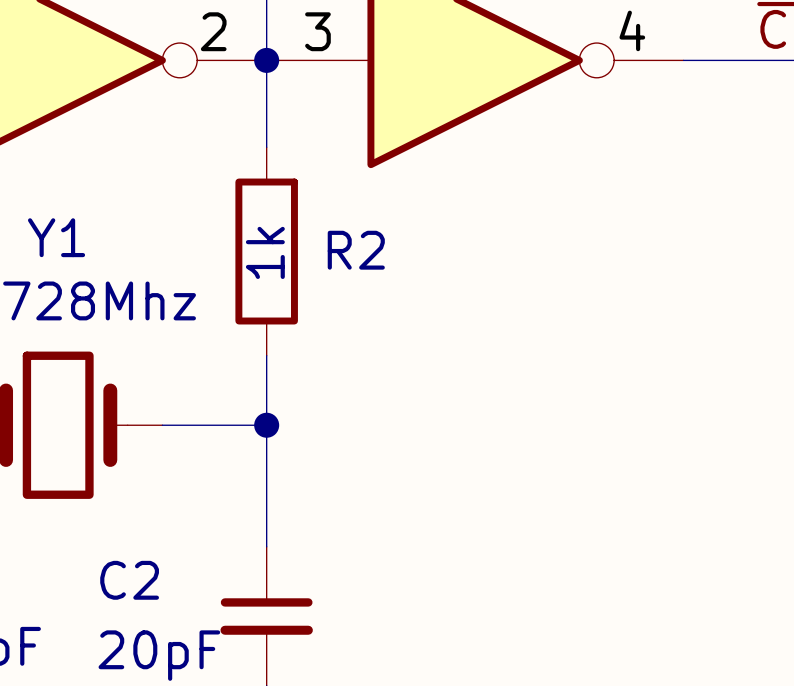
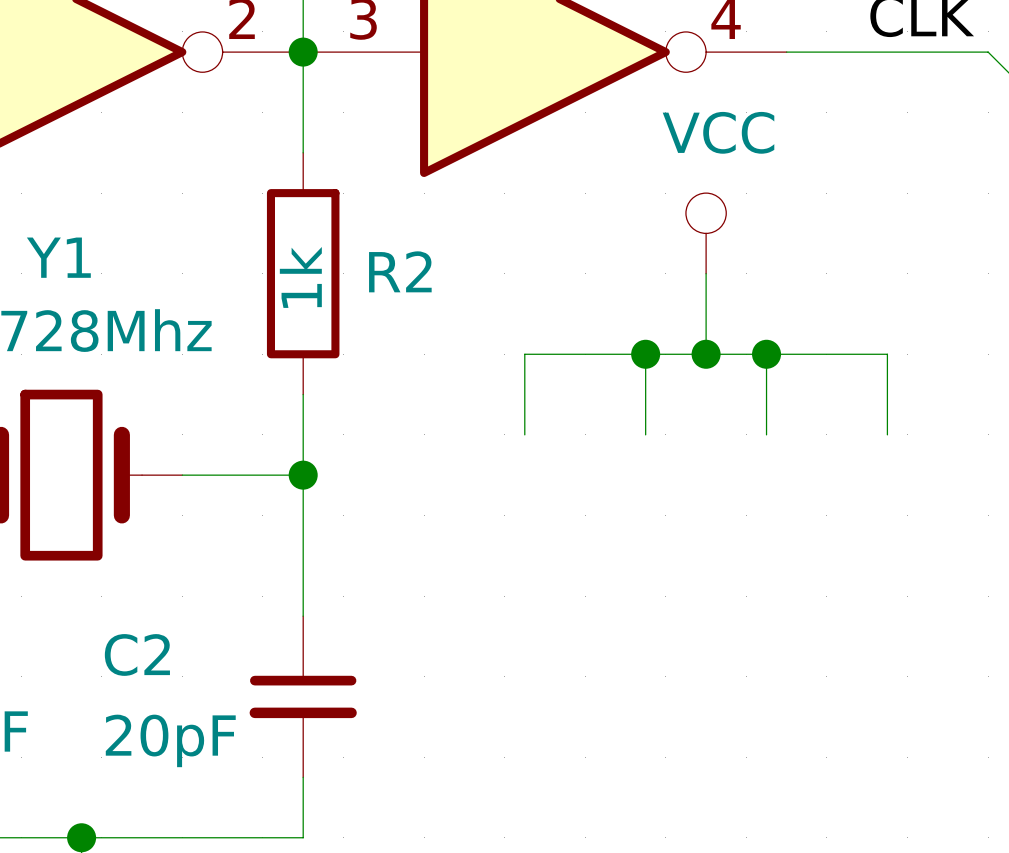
power symbol: none -> VCC (706, 233)
wire: none -> (706, 273) (706, 354)
wire: none -> (645, 354) (645, 434)
junction: none -> (645, 354)
junction: none -> (706, 354)
wire: none -> (766, 354) (766, 434)
junction: none -> (766, 354)
wire: none -> (524, 434) (524, 354) (887, 354) (887, 434)

